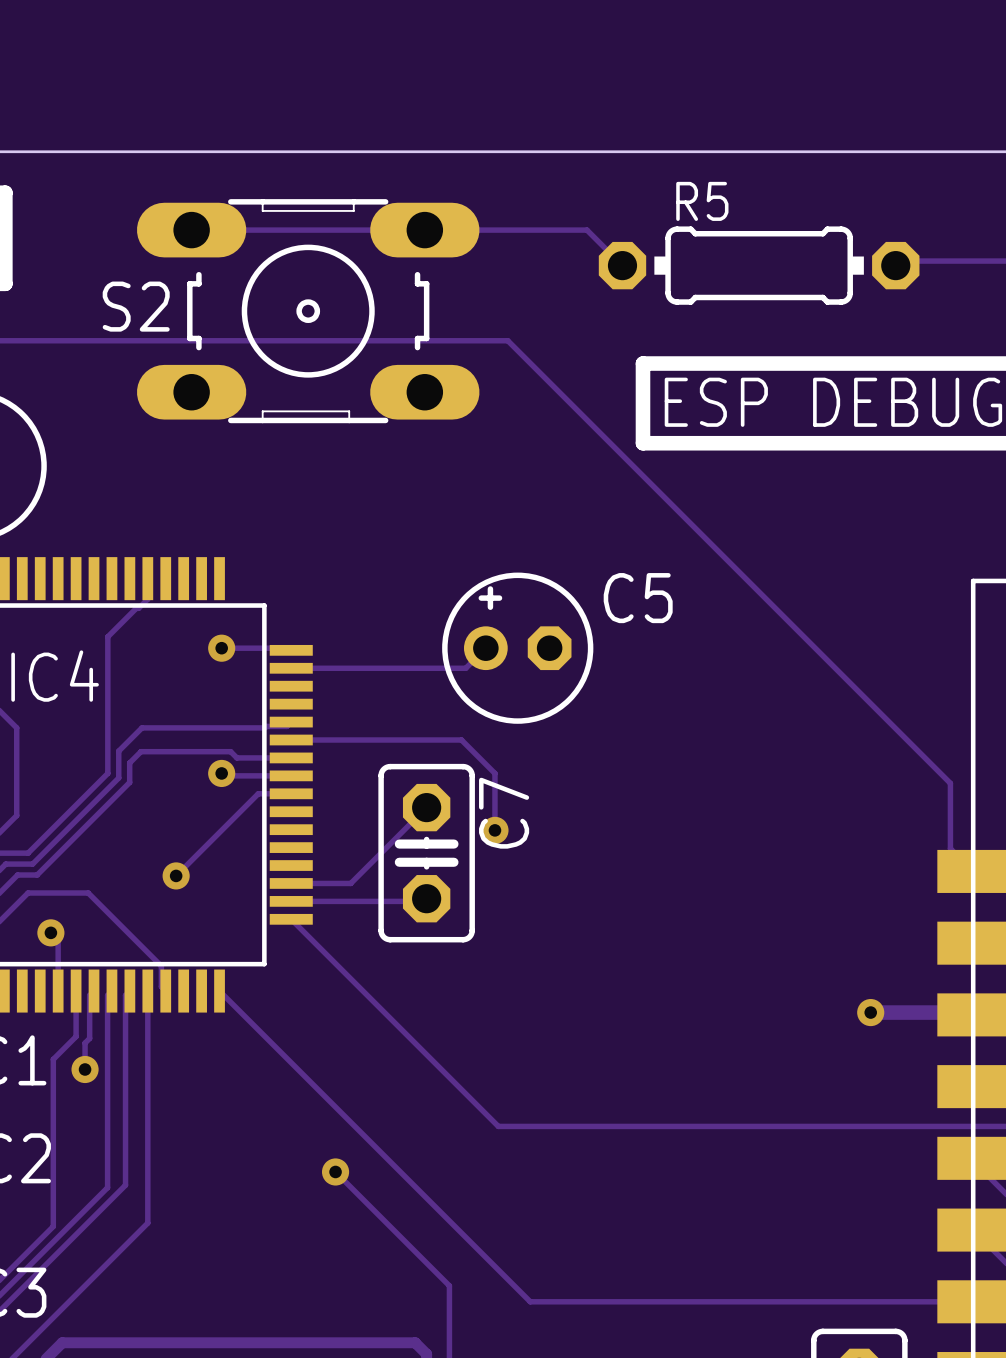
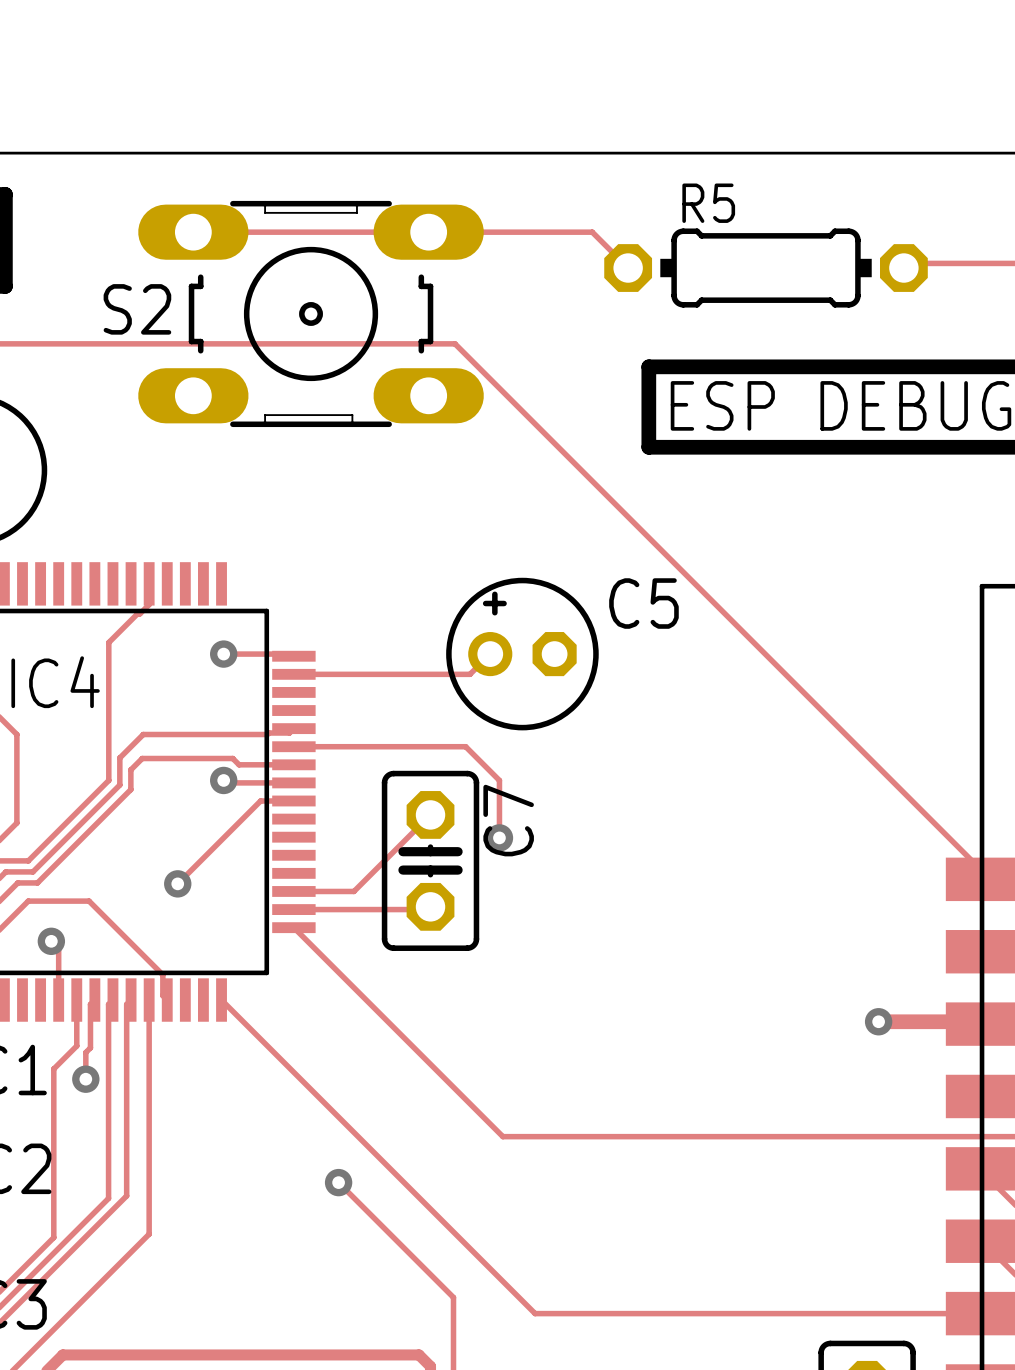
track: (450, 340) (507, 340) (950, 783) (950, 848) (973, 871) -> (455, 343) (982, 870) (982, 879)

